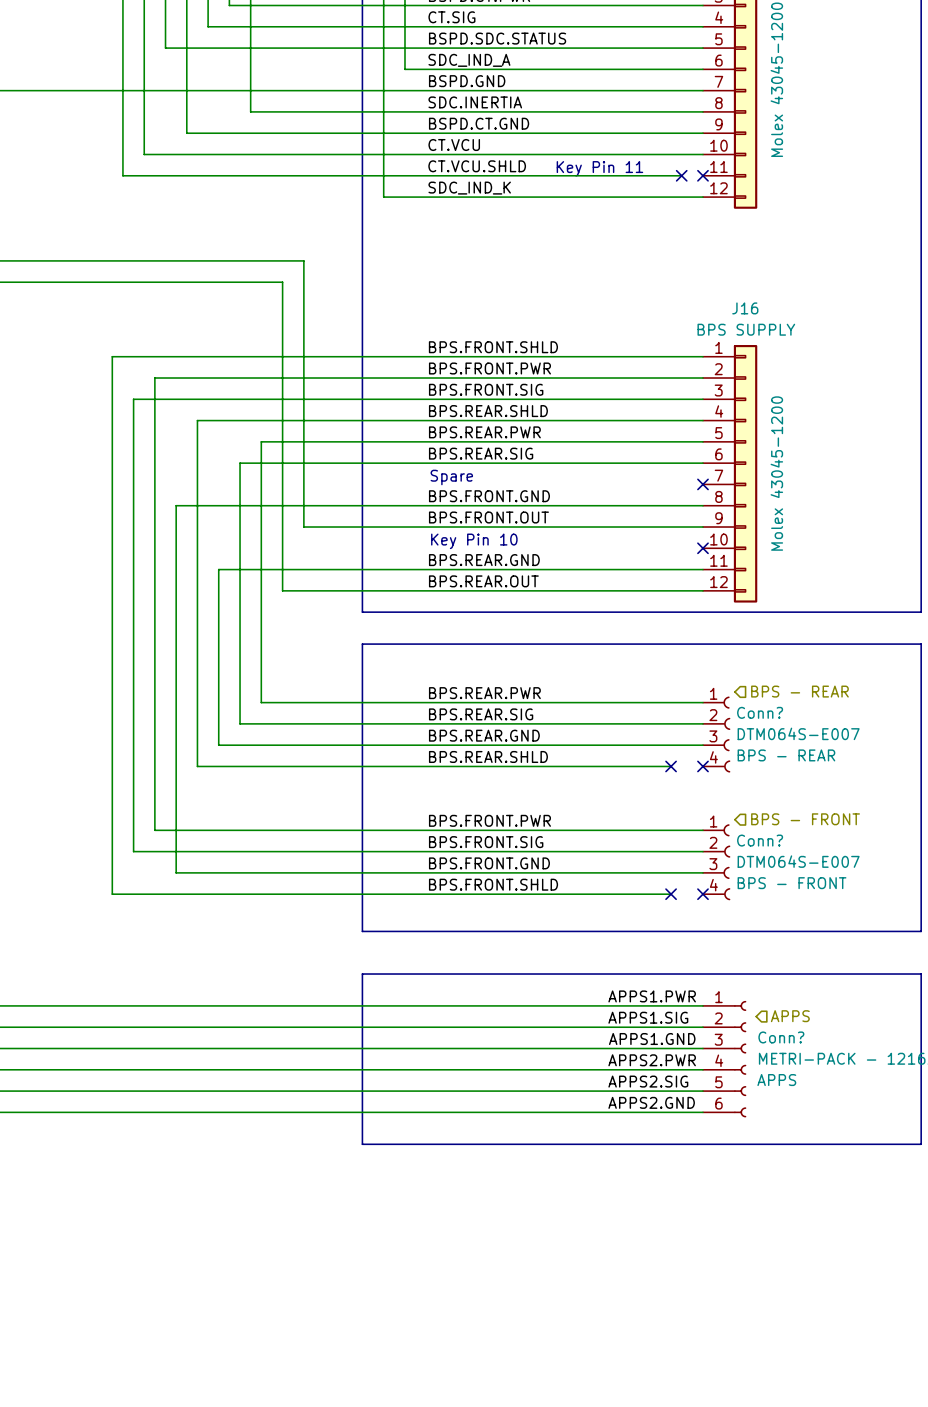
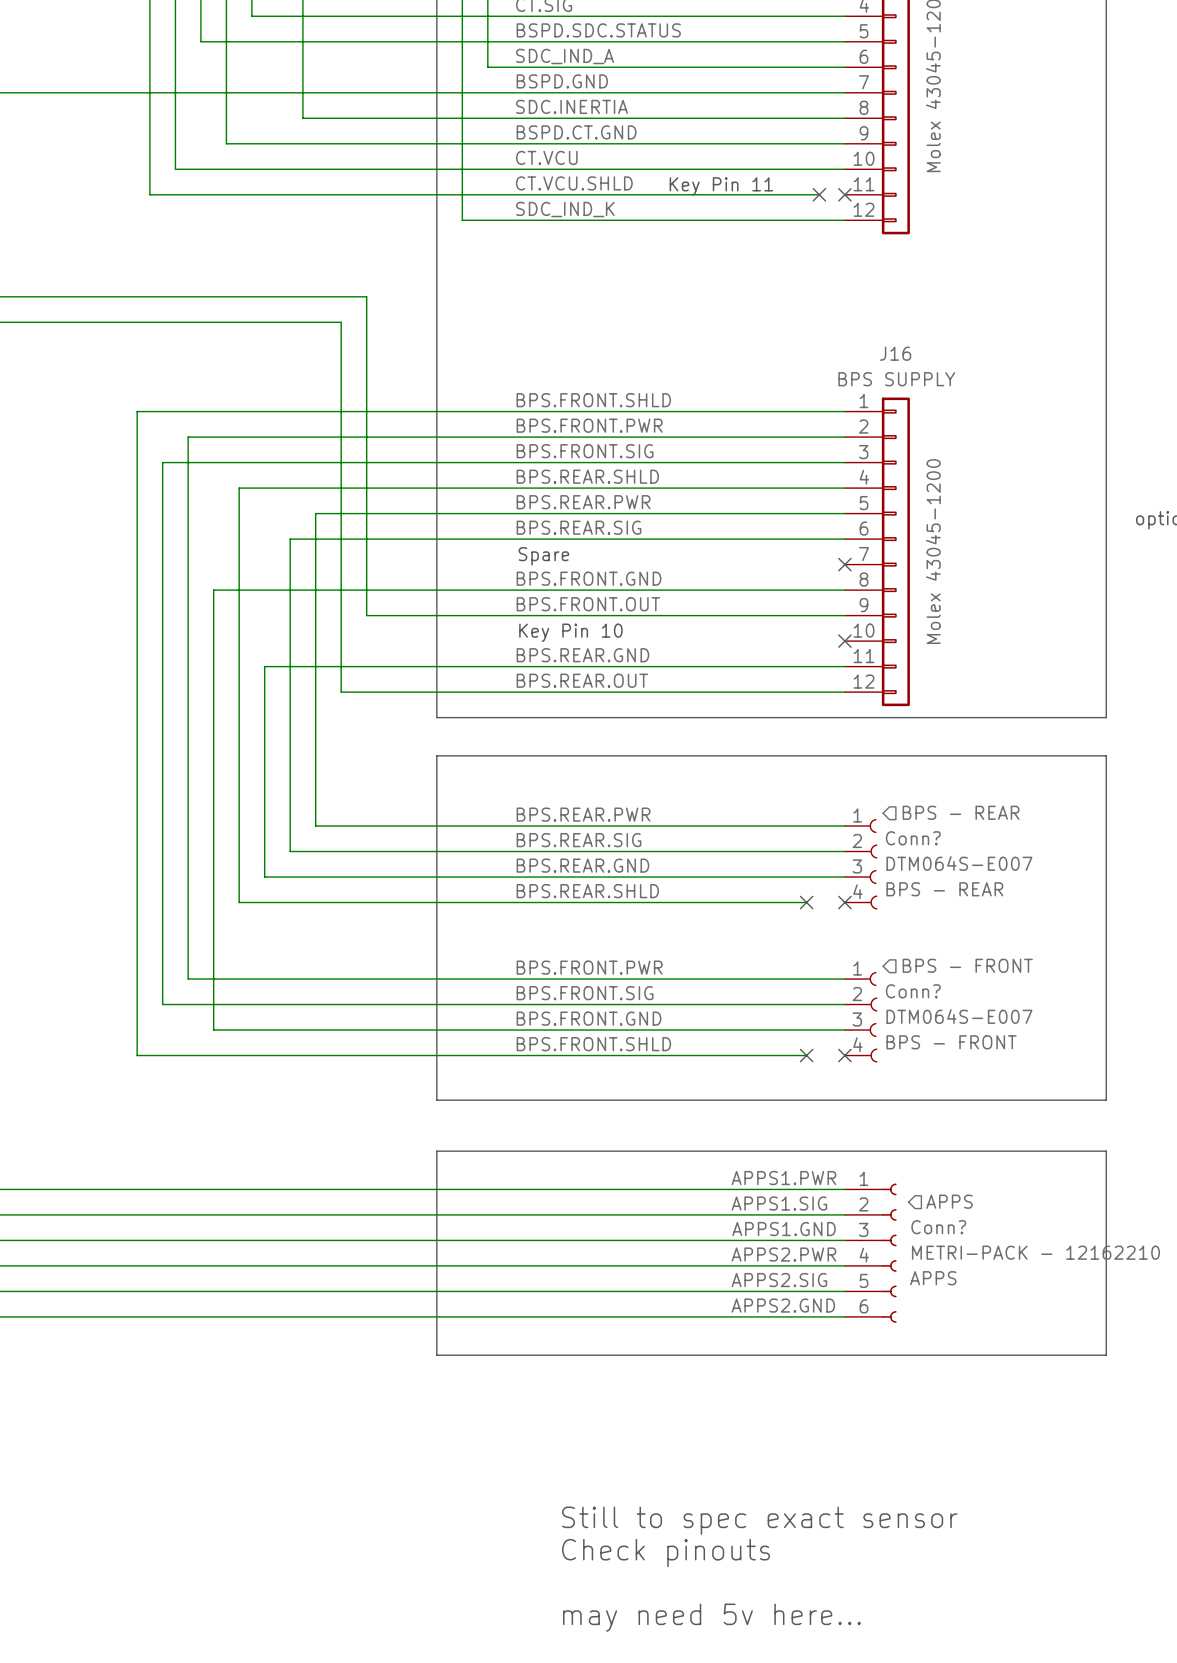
text: none -> Still to spec exact sensor (759, 1520)
text: none -> Check pinouts (666, 1553)
text: none -> may need 5v here... (711, 1617)

